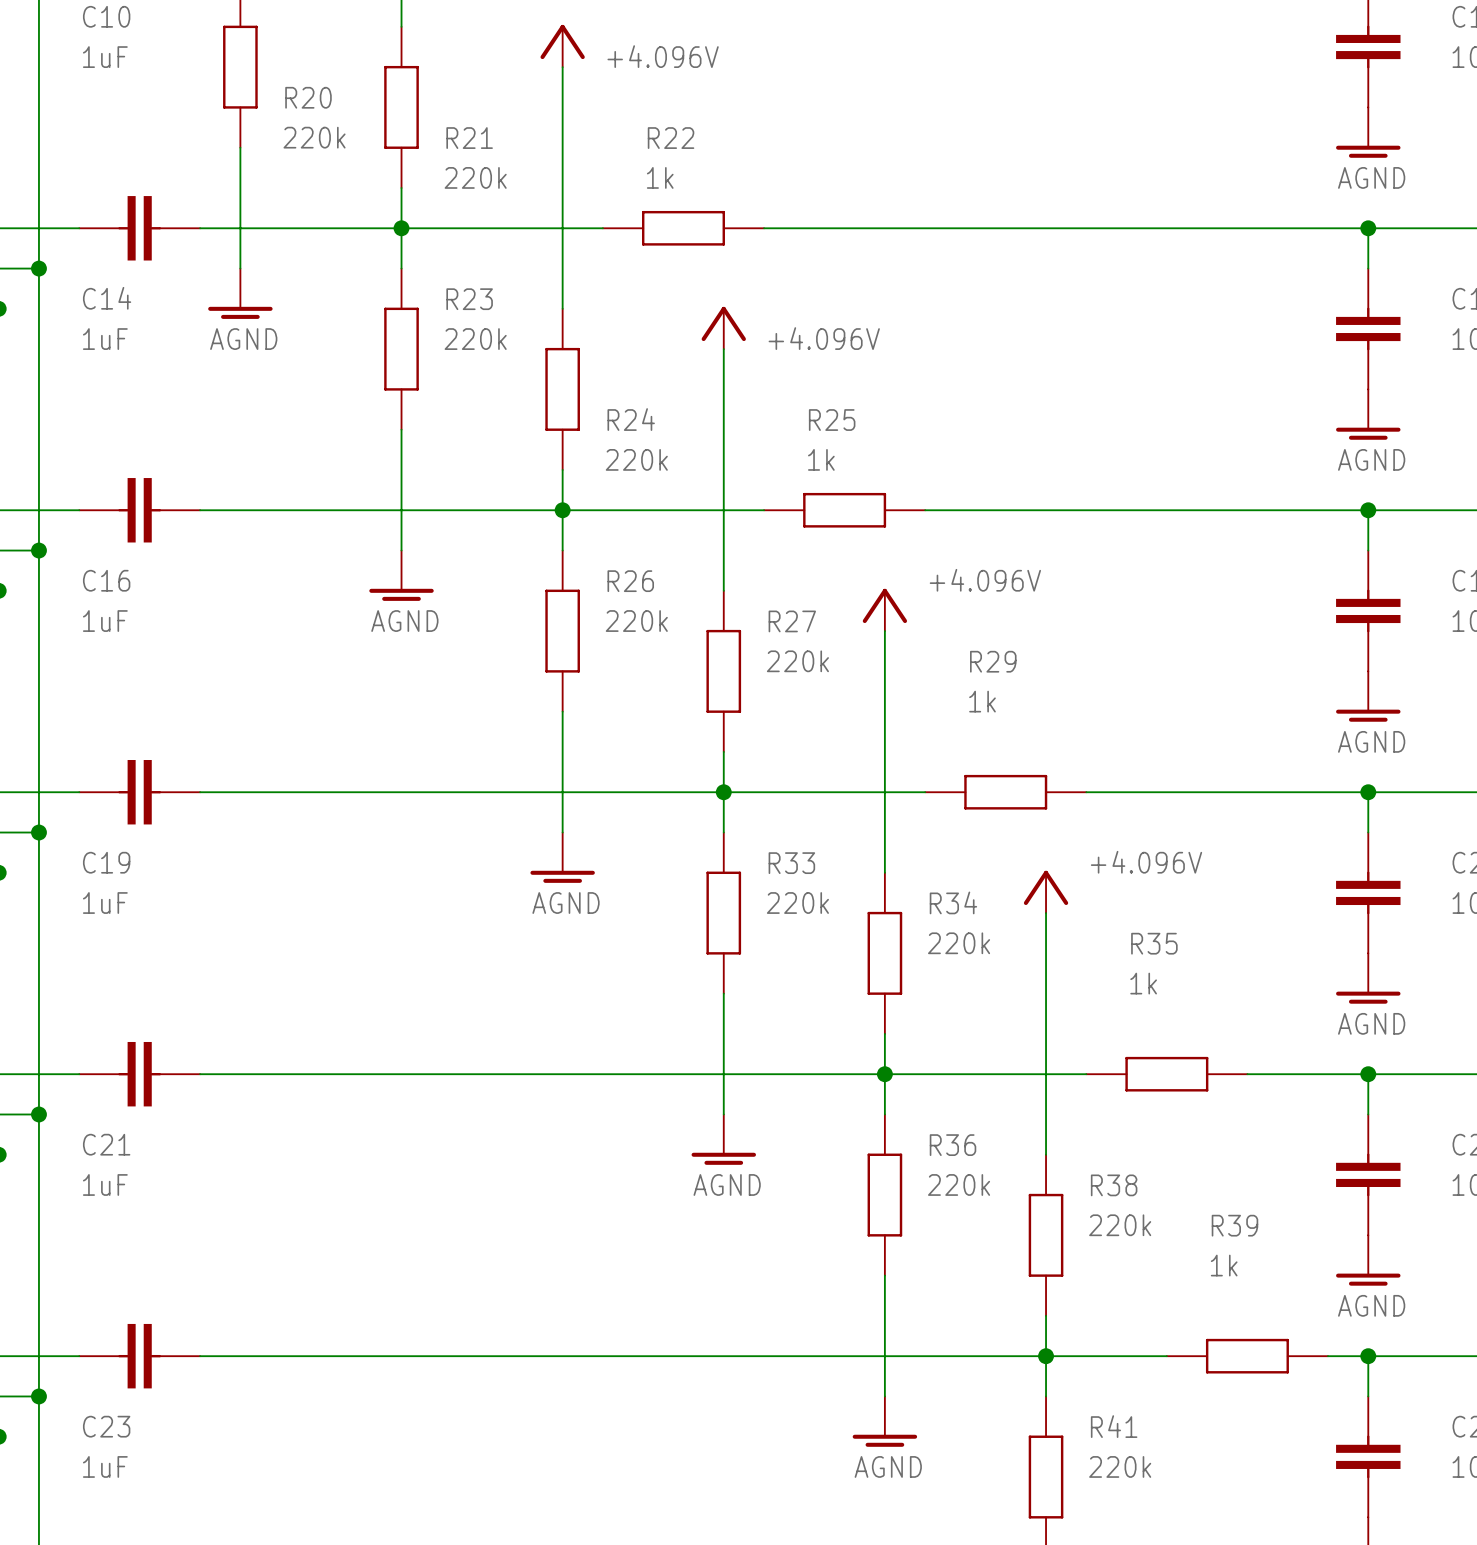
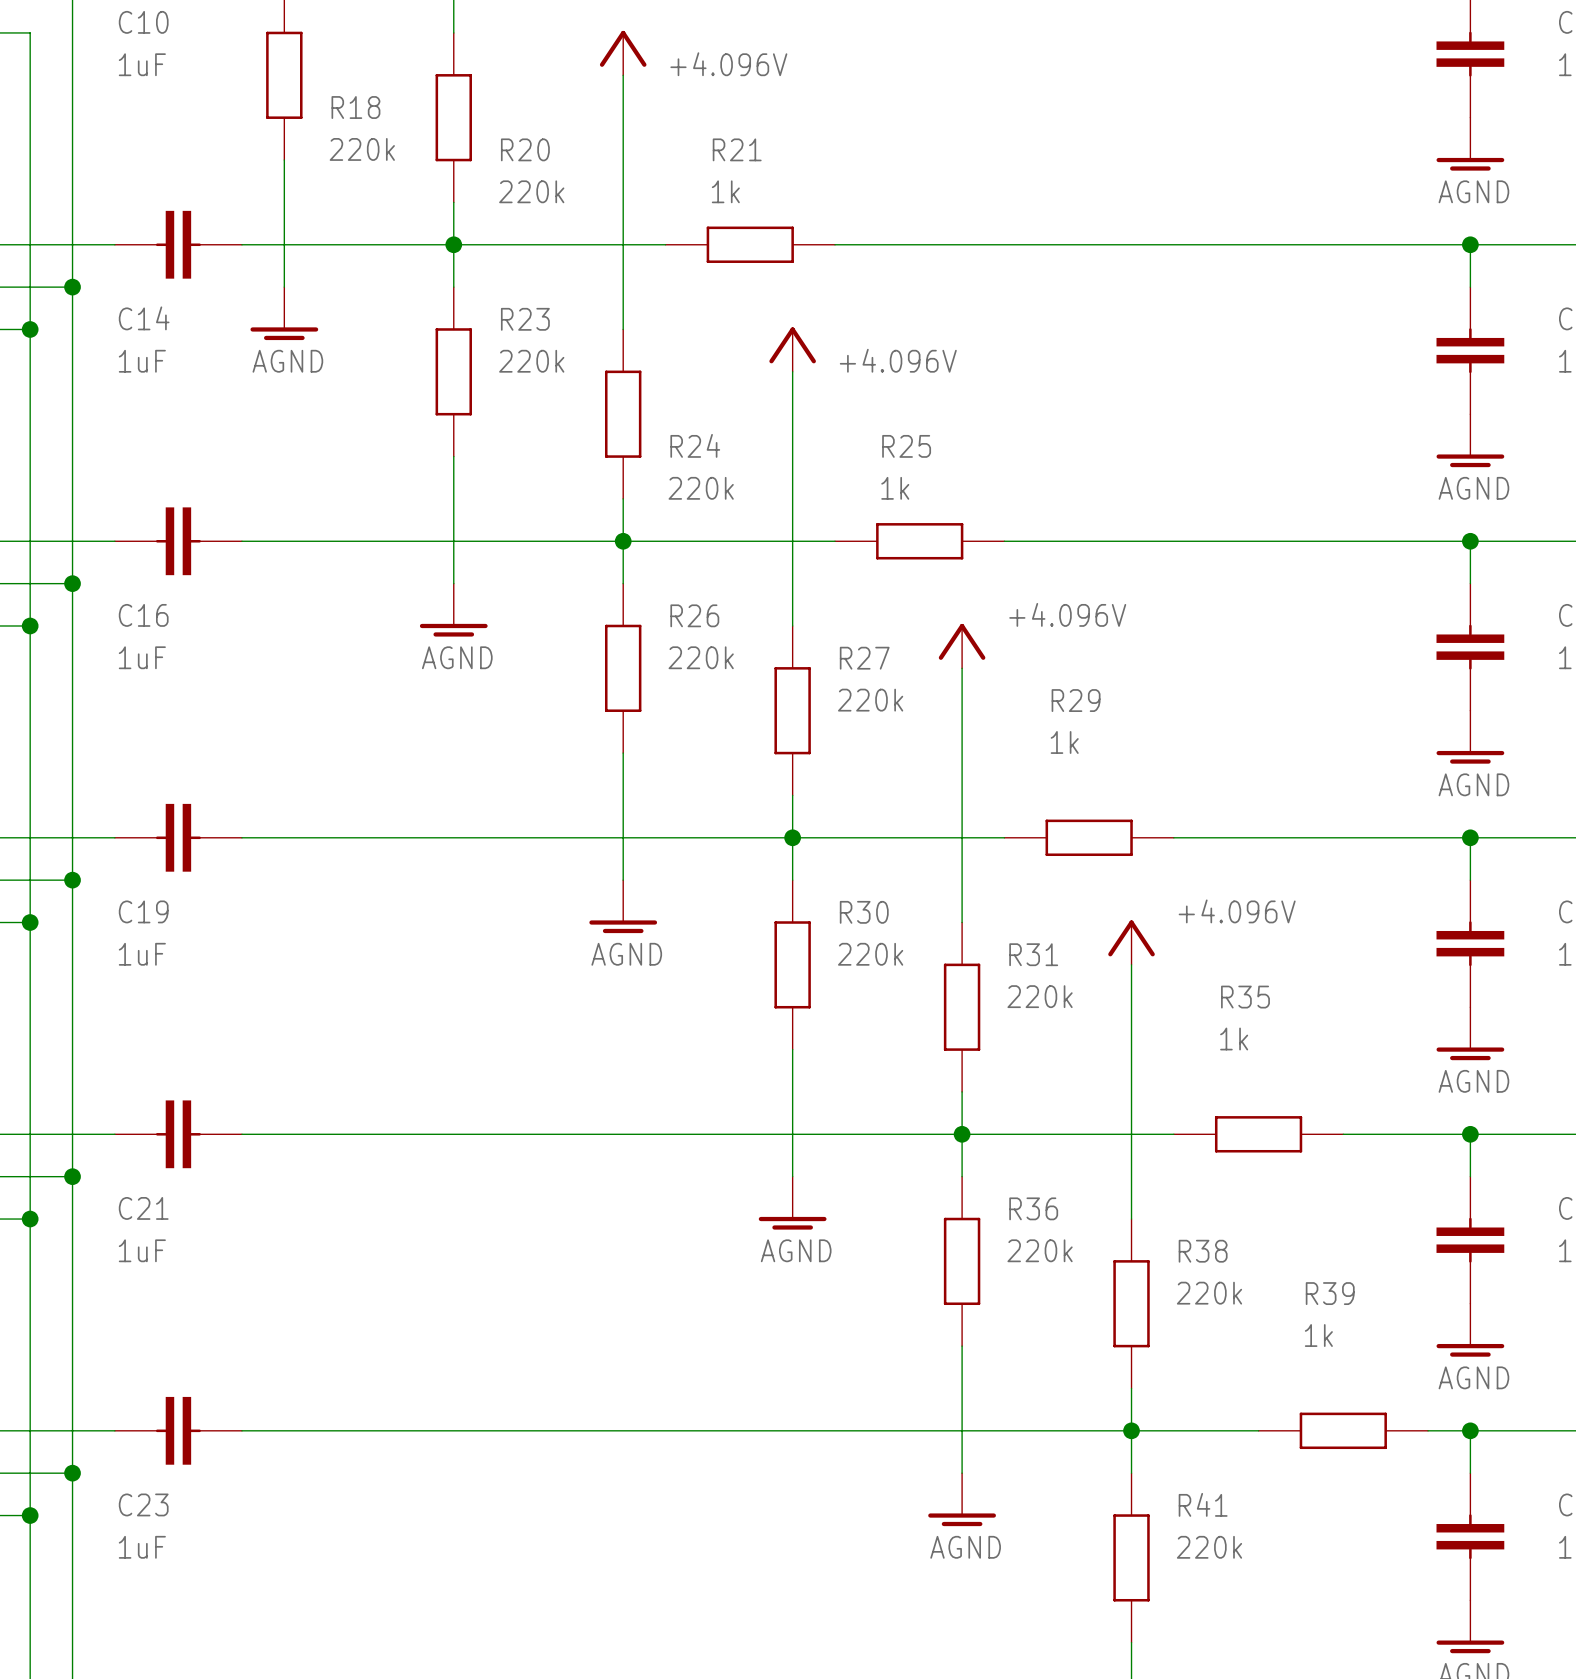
R20 name: R20 (308, 97) -> R18 (355, 107)
R21 name: R21 (469, 138) -> R20 (525, 149)
R22 name: R22 (671, 138) -> R21 (737, 149)
R33 name: R33 (791, 863) -> R30 (864, 912)
R34 name: R34 (953, 902) -> R31 (1033, 954)

